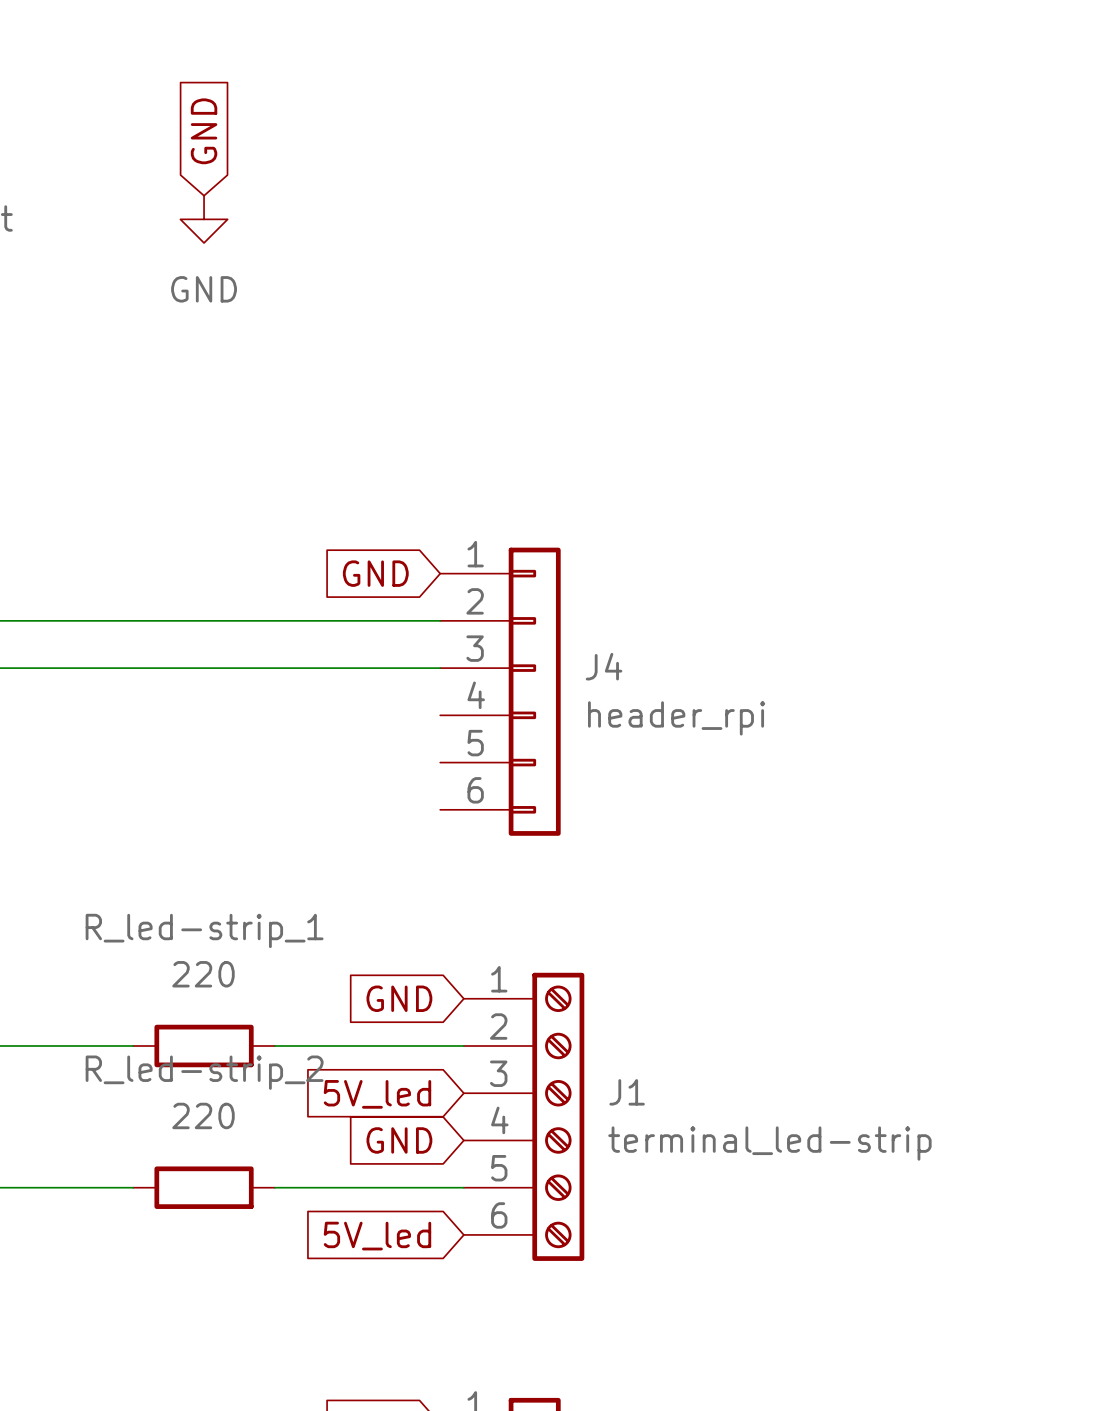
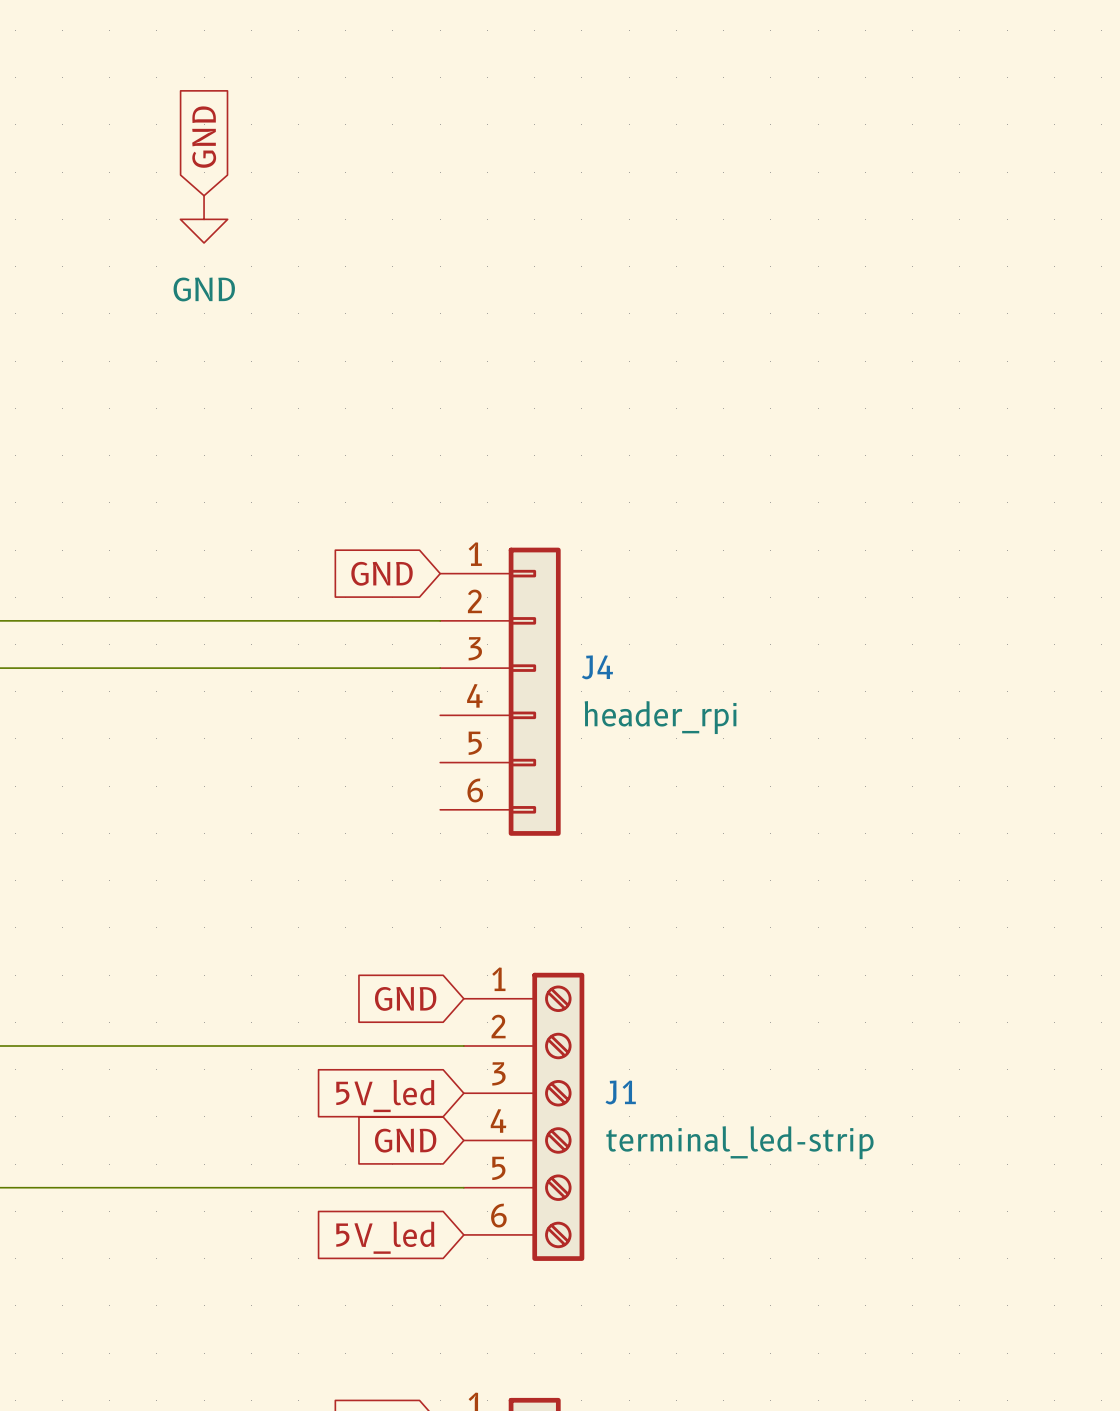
wire: none -> (133, 1046) (274, 1046)
R_led-strip_1: 220 (204, 1046) -> none
wire: none -> (133, 1187) (274, 1187)
R_led-strip_2: 220 (204, 1187) -> none

